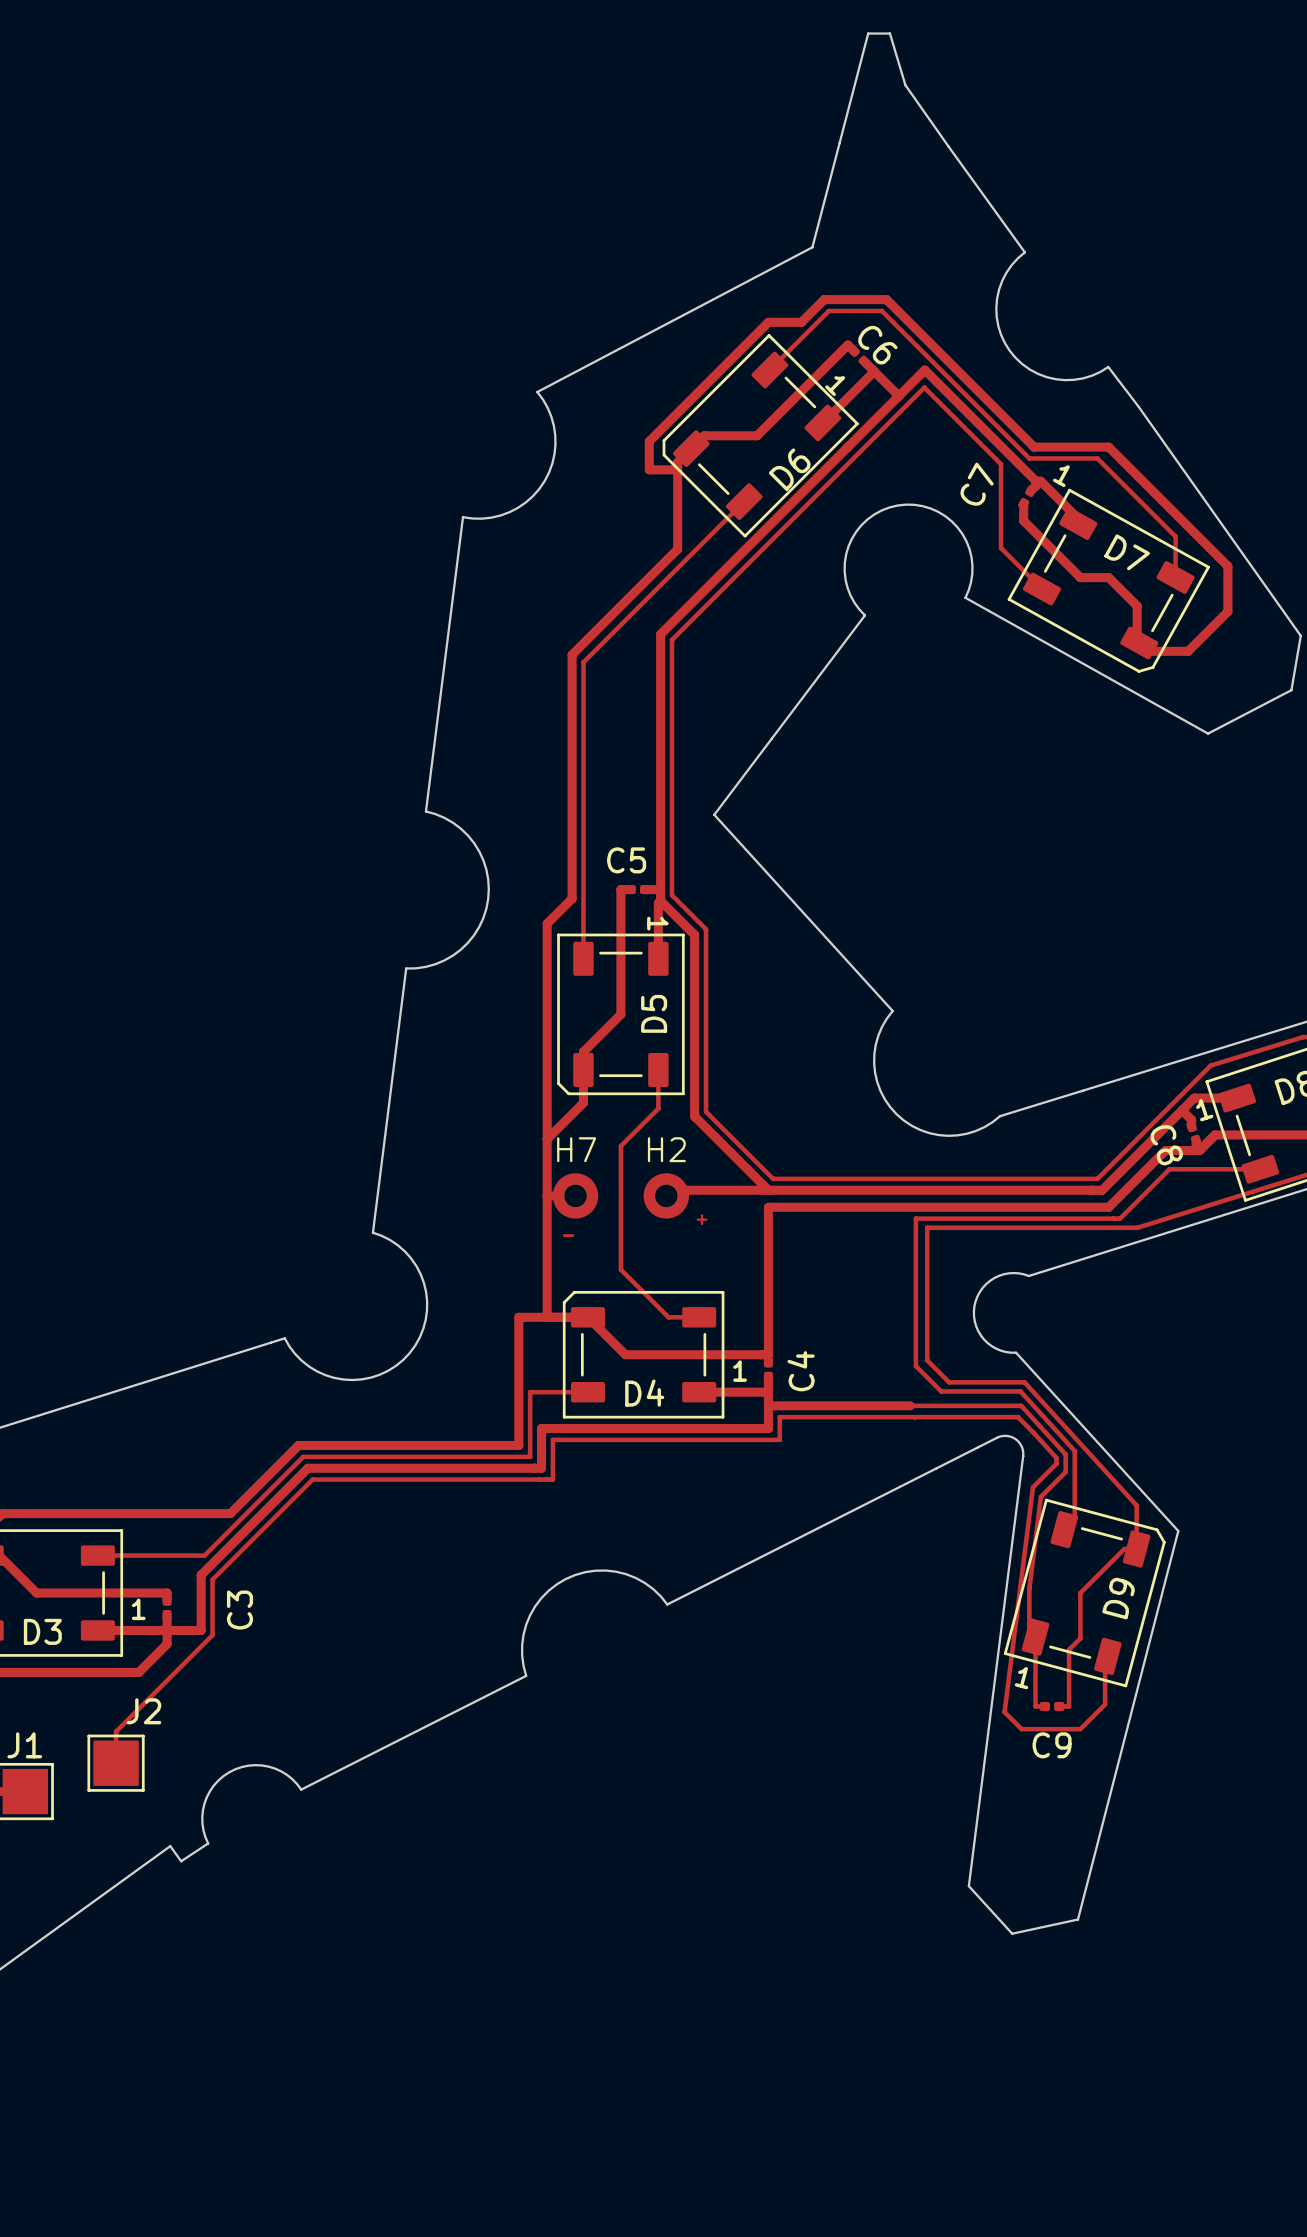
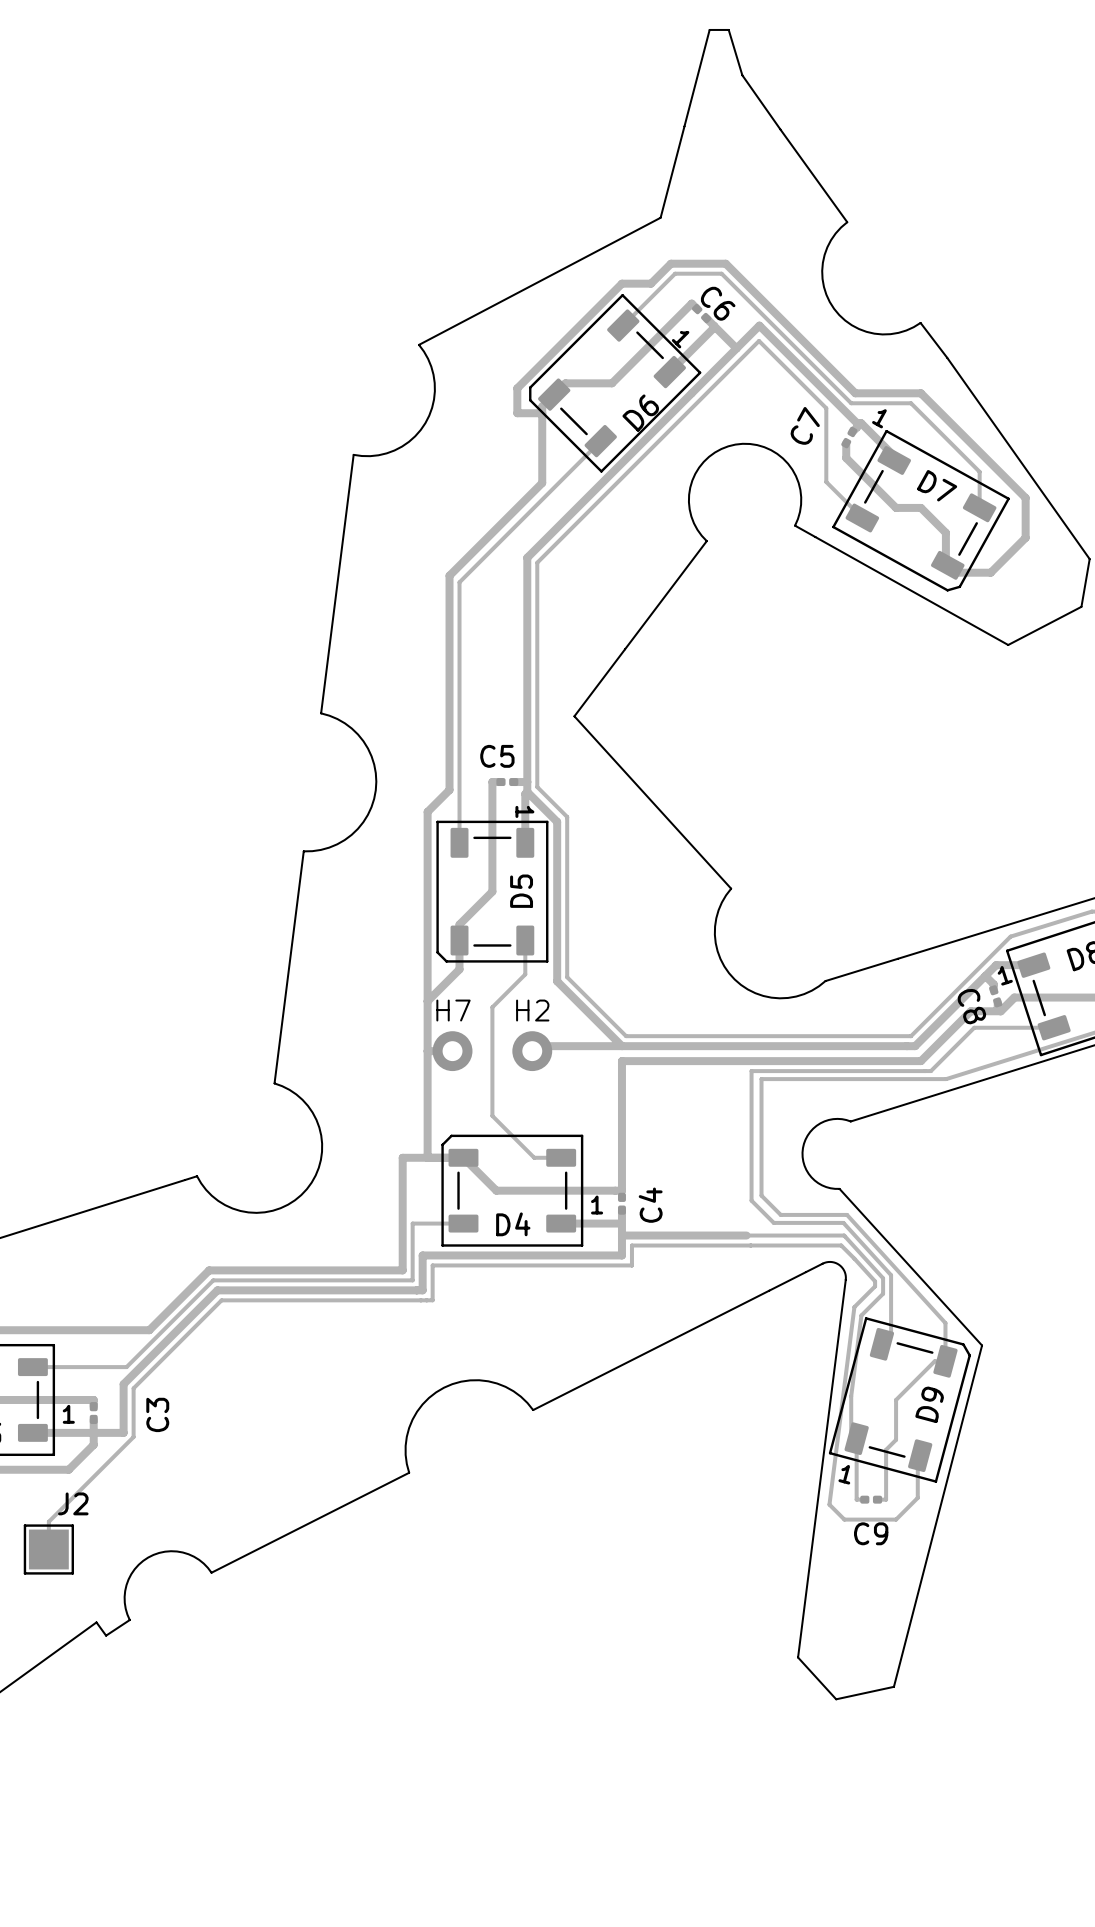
text: + (702, 1219) -> none
text: - (568, 1235) -> none

